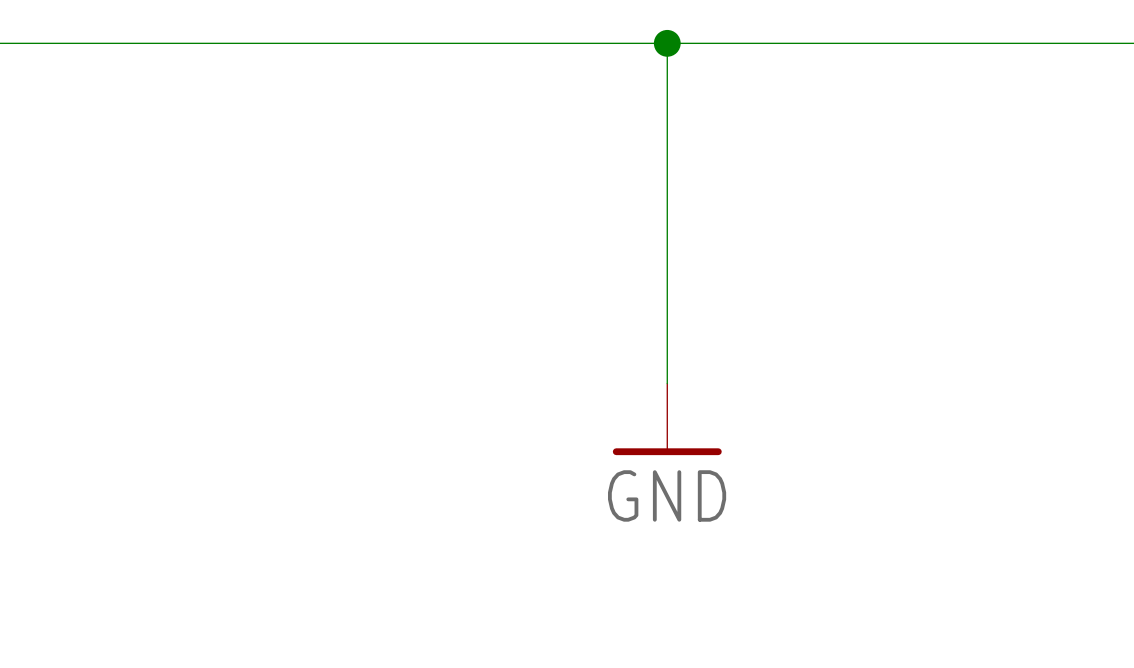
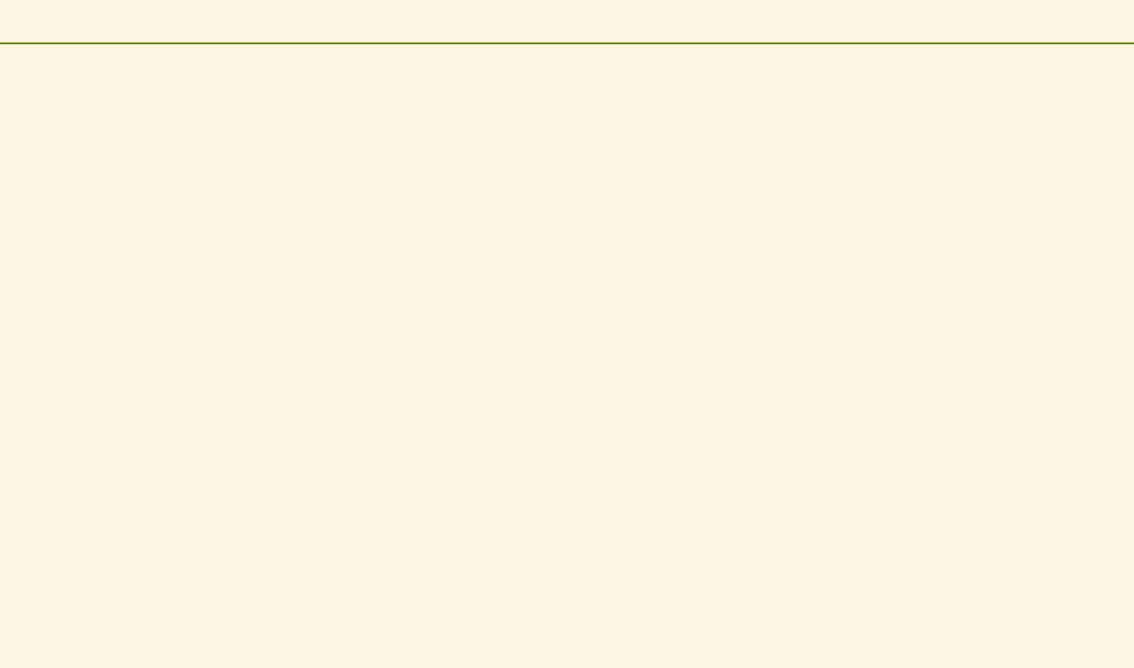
wire: (667, 43) (667, 383) -> none
junction: (667, 43) -> none
power symbol: GND (667, 419) -> none

